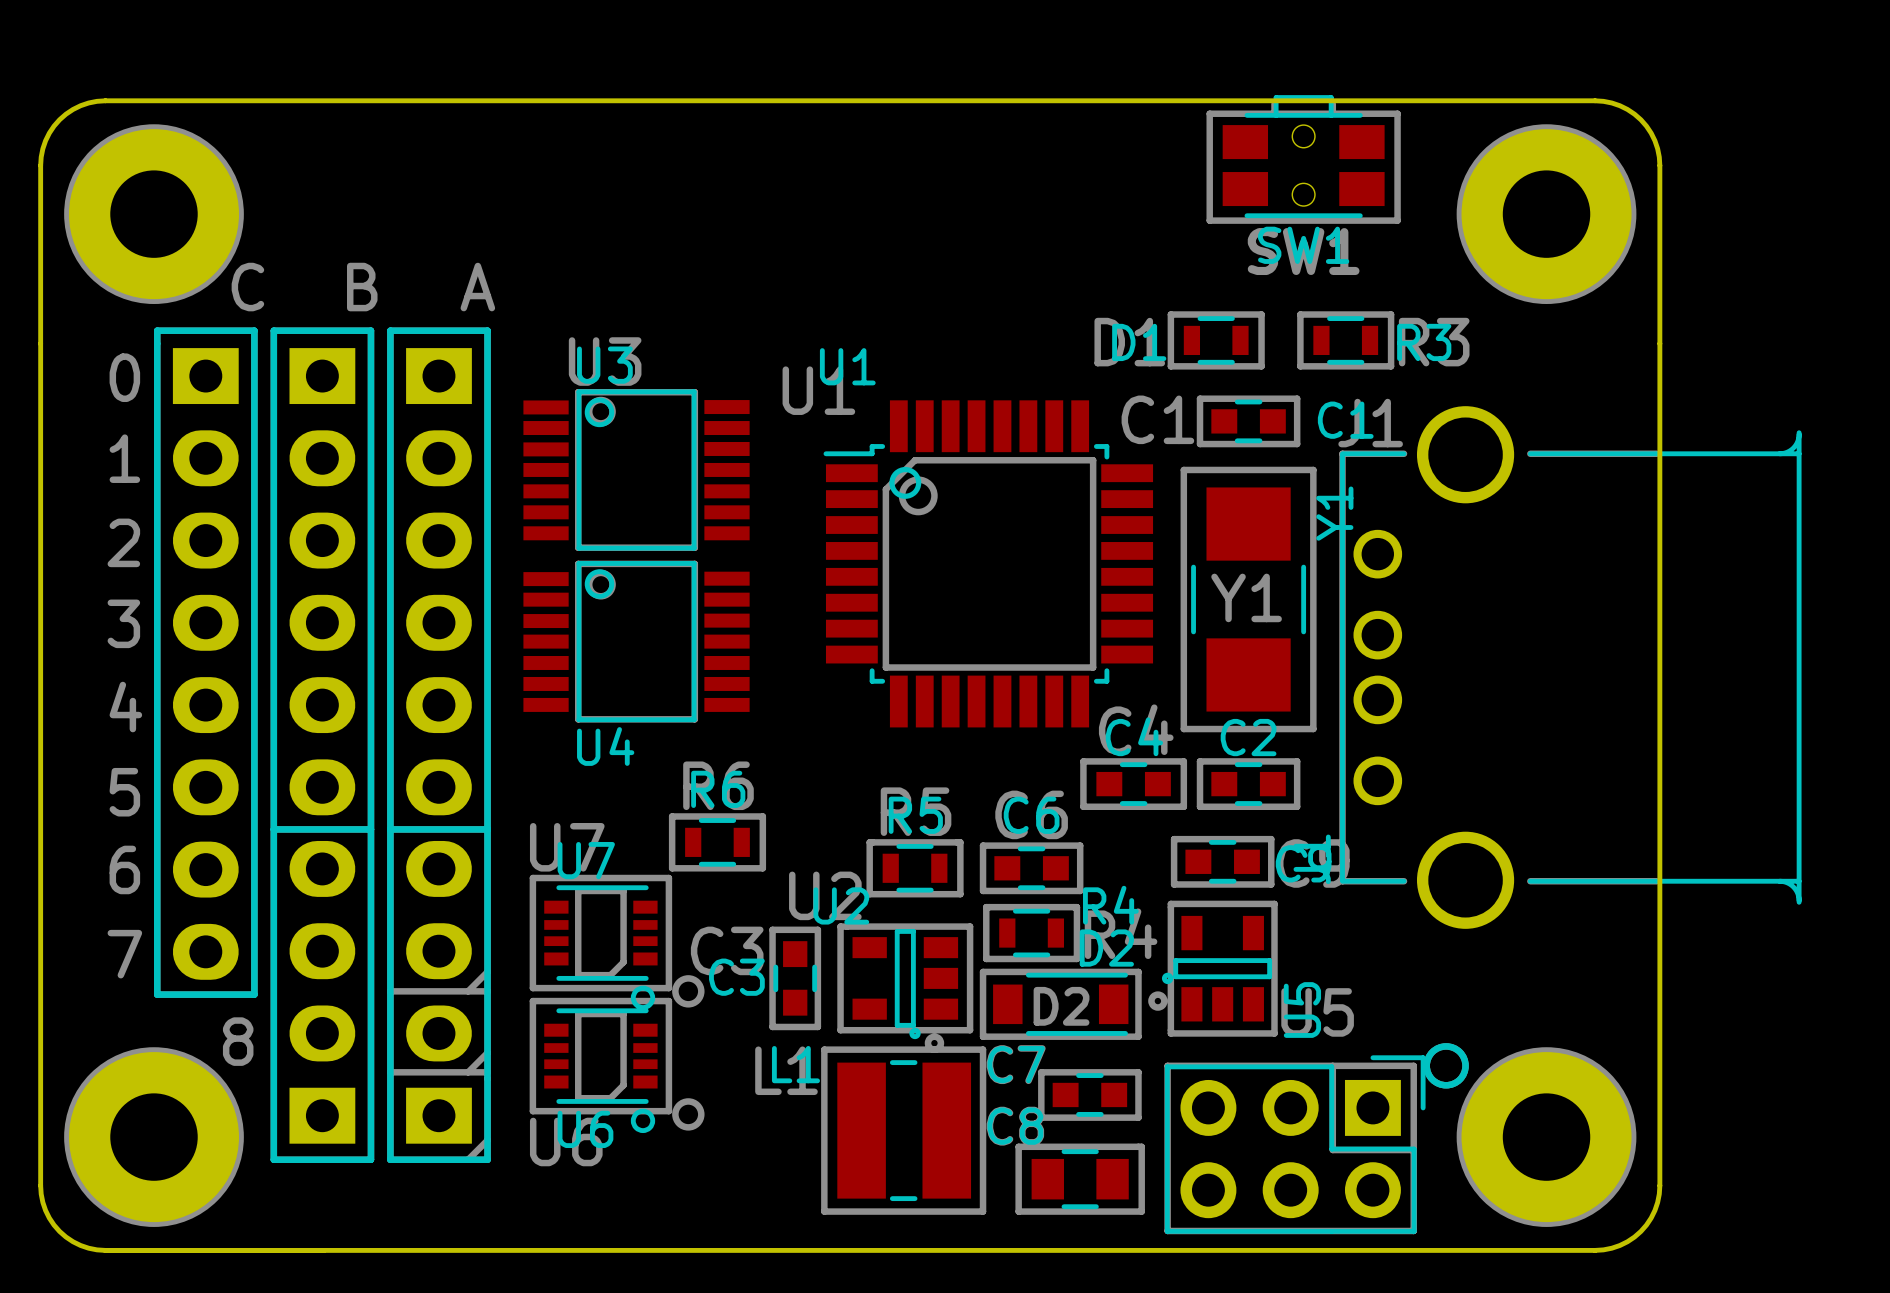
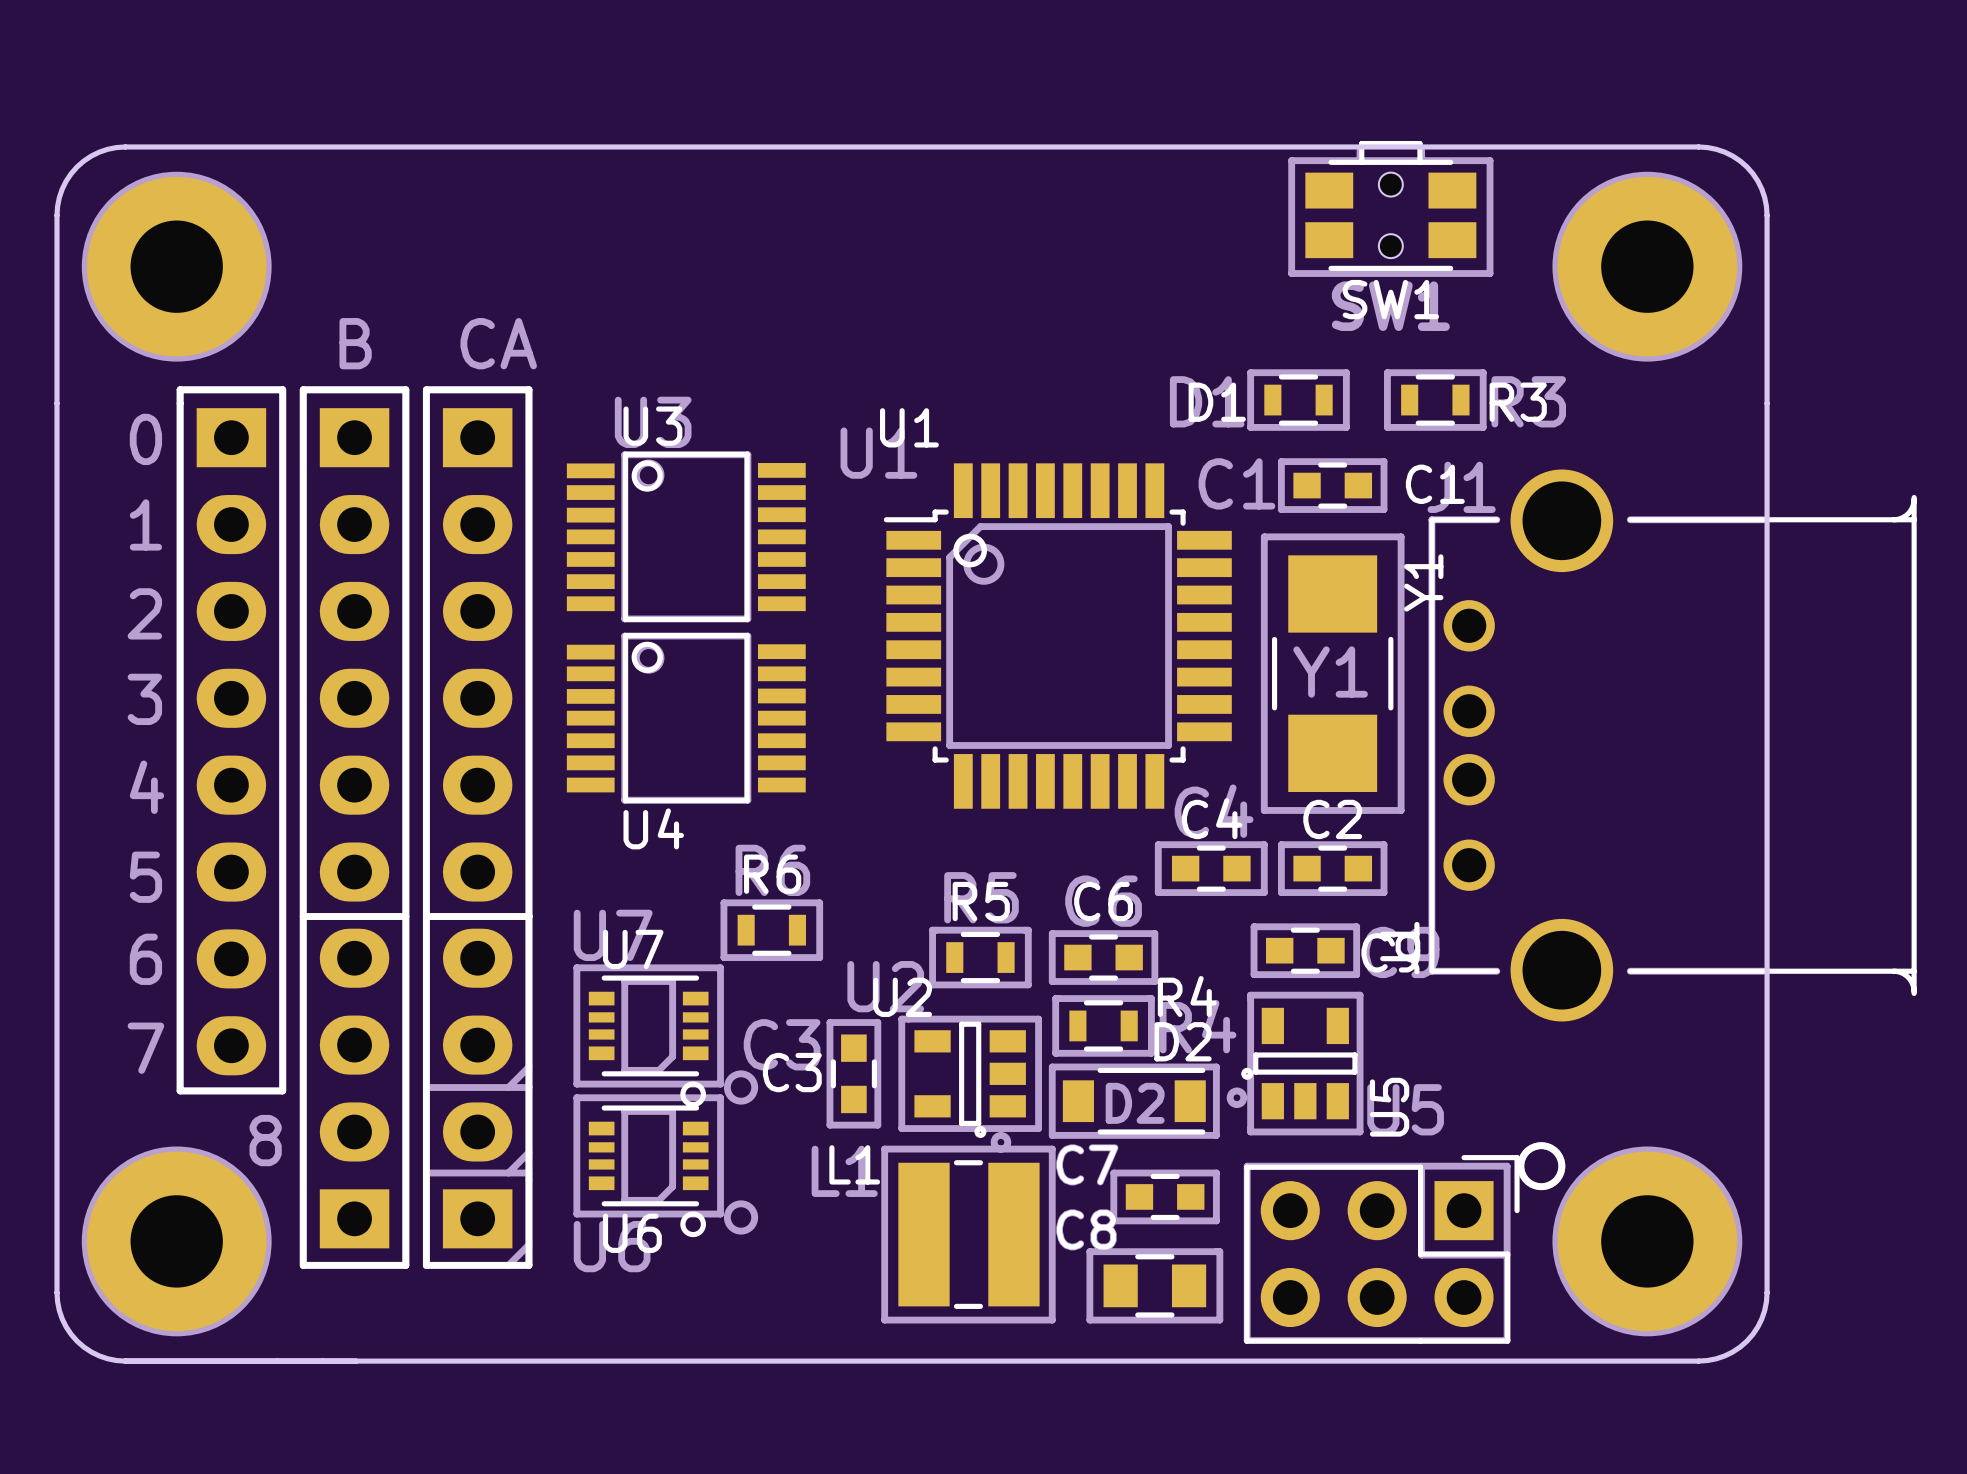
text position: C (247, 287) -> C (477, 343)
text position: B (362, 287) -> B (355, 343)

